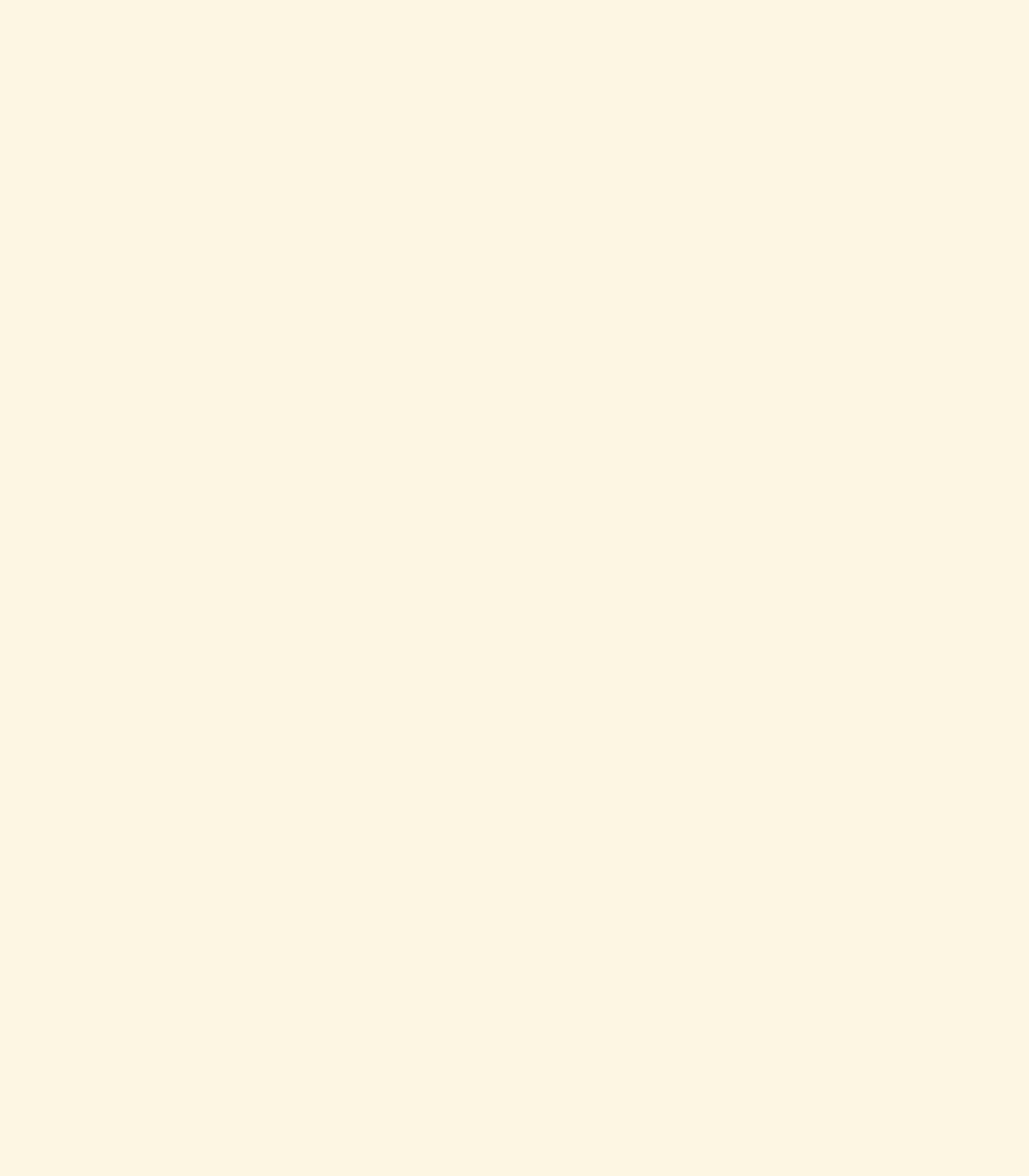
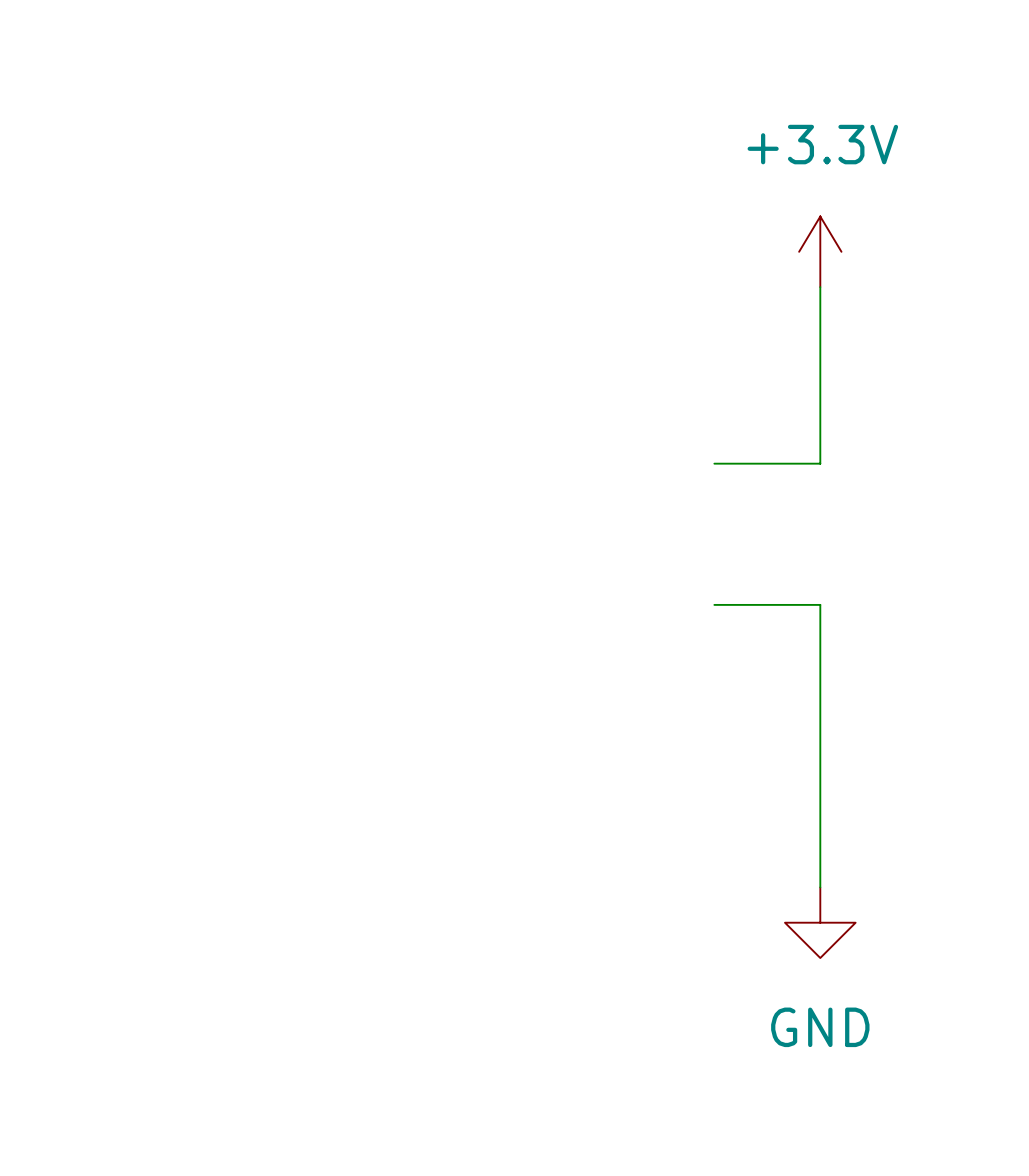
power symbol: none -> +3.3V (820, 251)
wire: none -> (820, 287) (820, 463) (714, 463)
wire: none -> (714, 604) (820, 604) (820, 887)
power symbol: none -> GND (820, 922)

